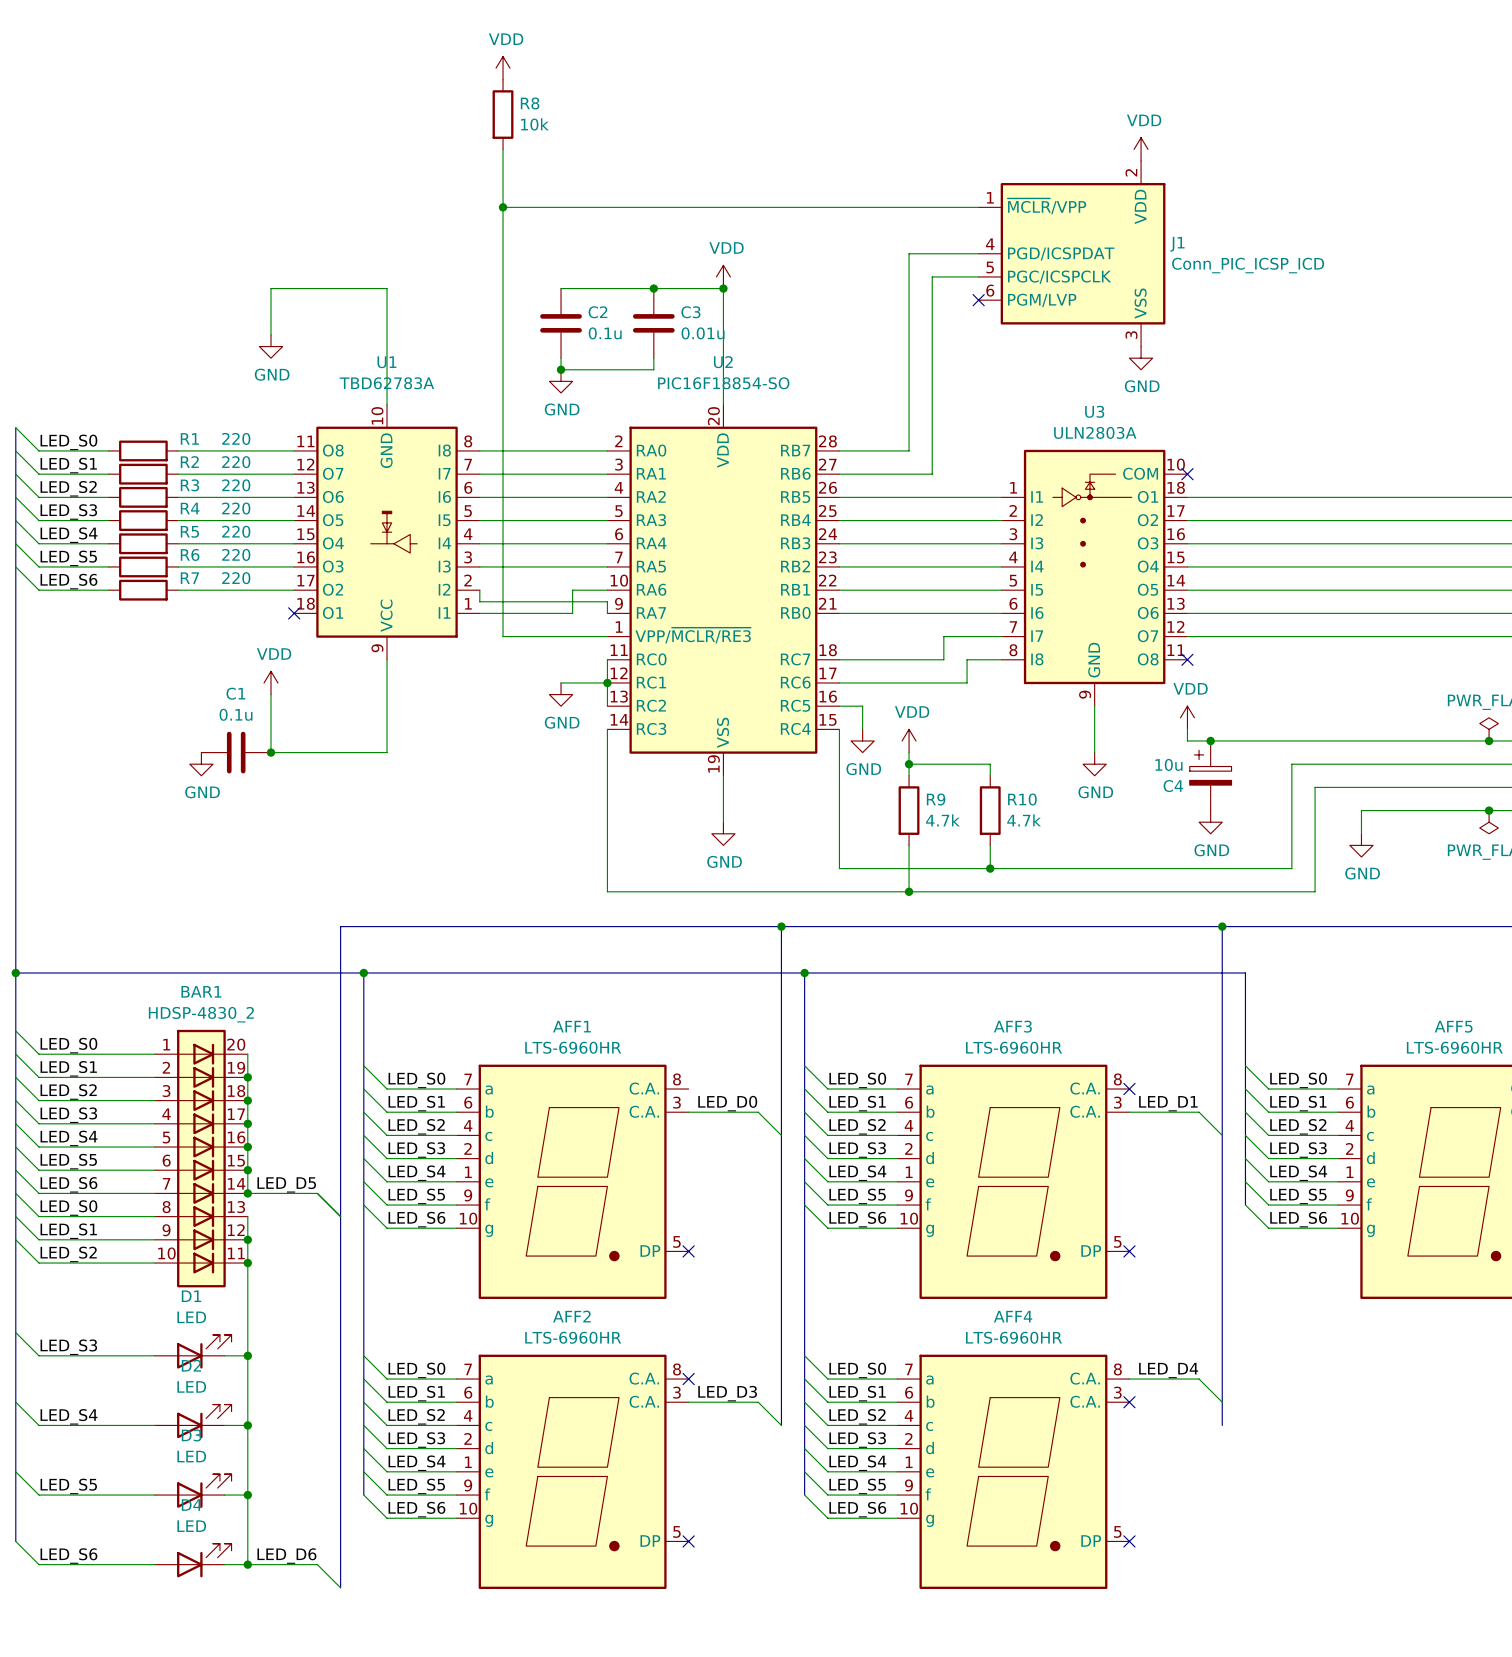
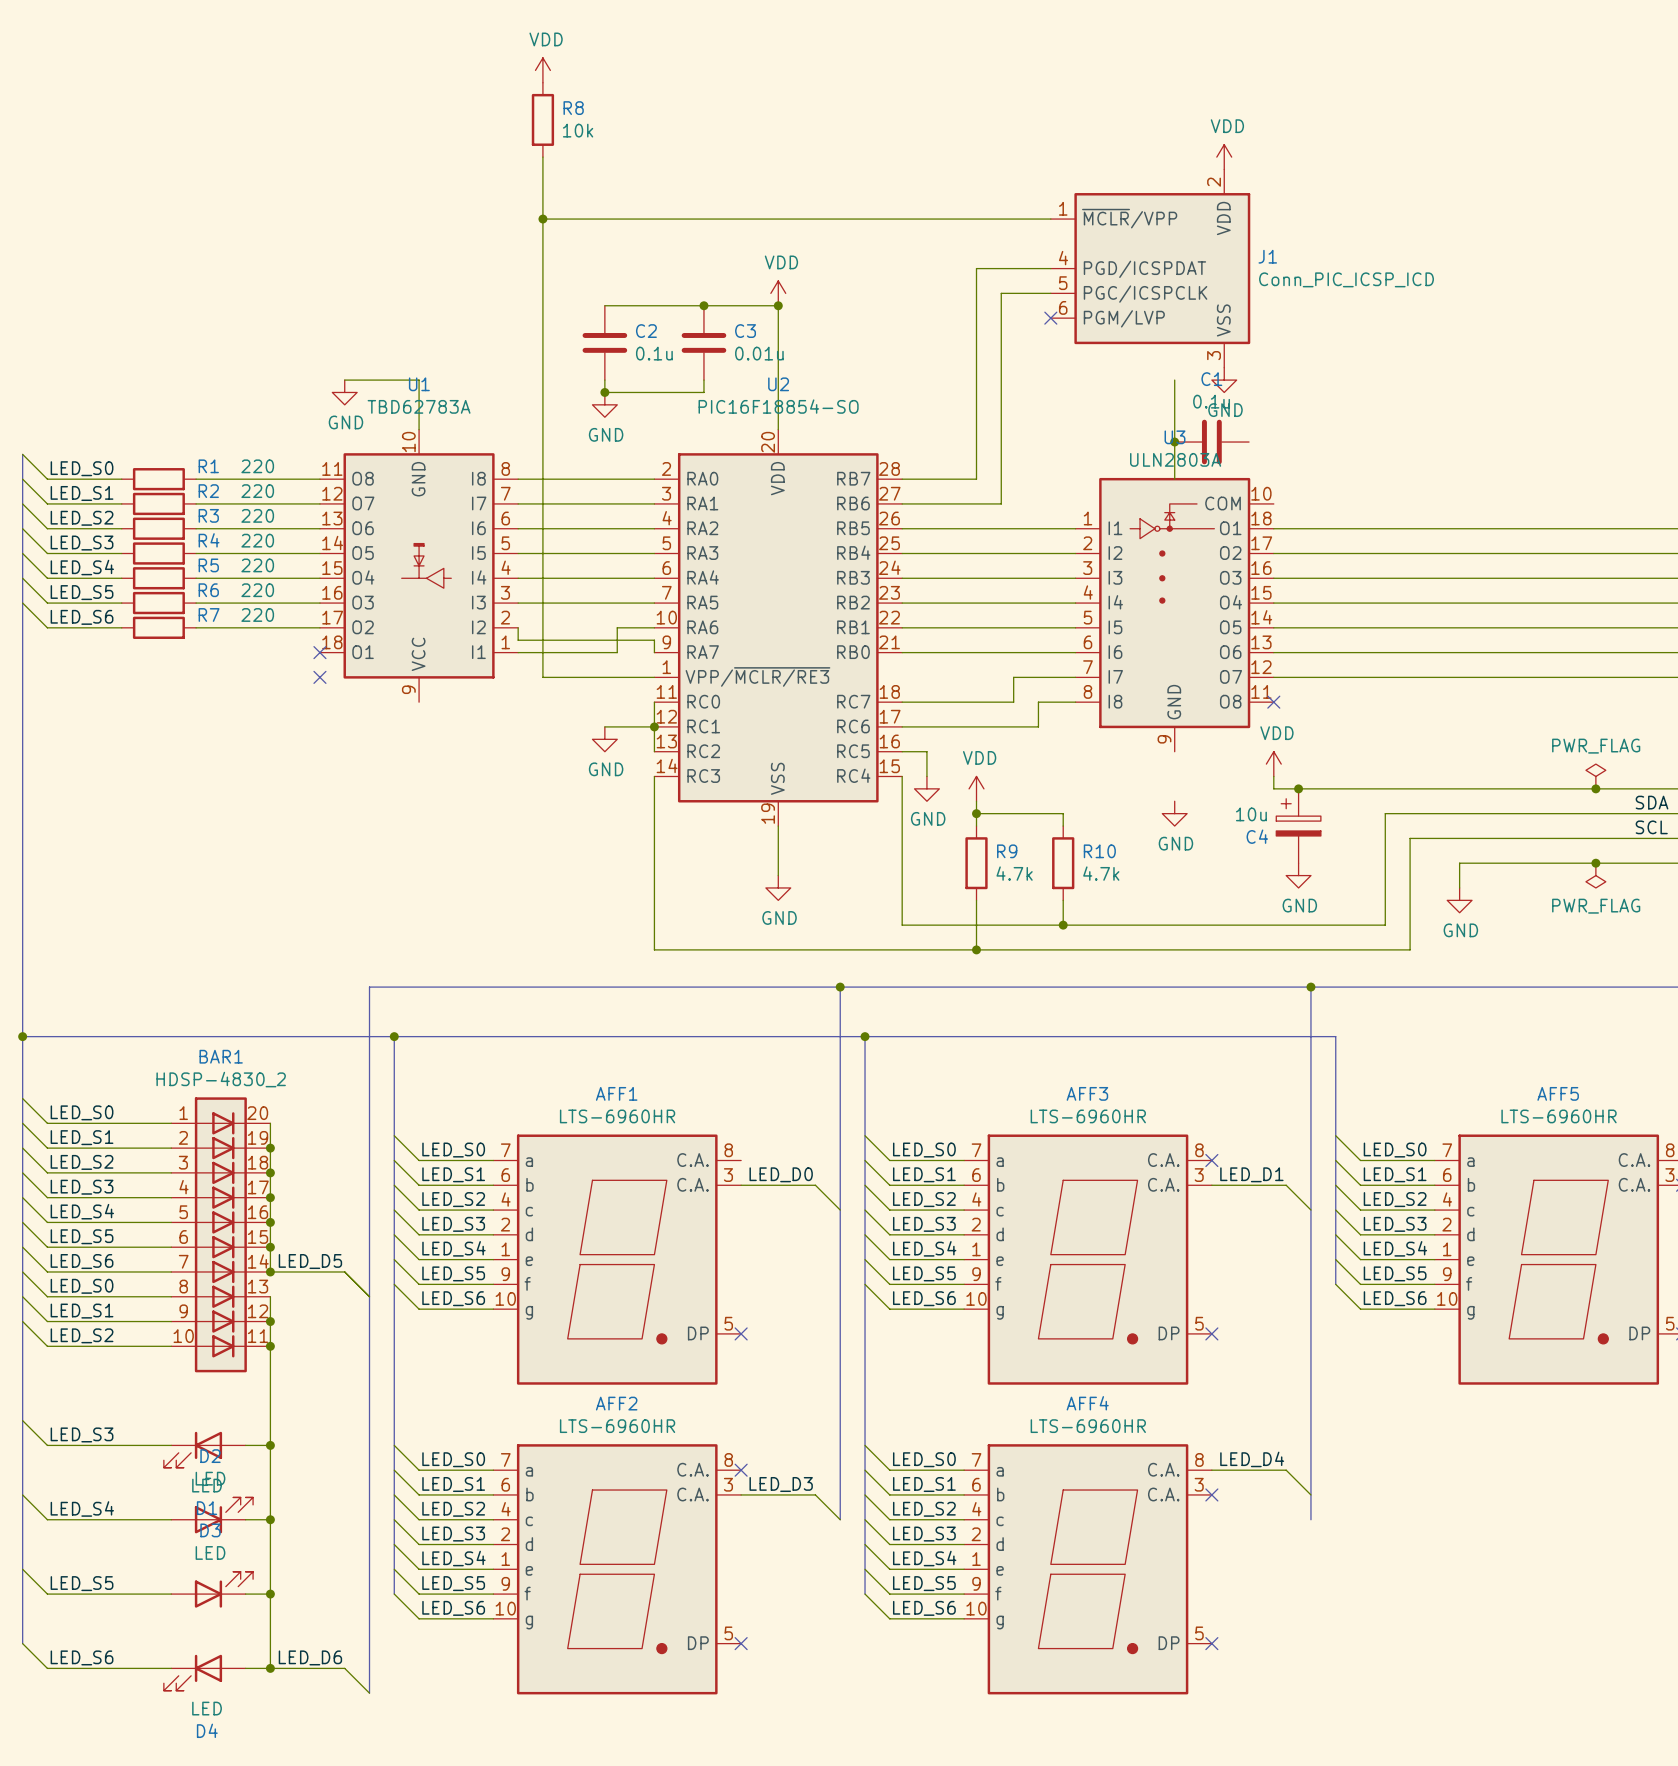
wire: (271, 334) (271, 288) (387, 288) (387, 358) -> (344, 380) (419, 380)
power symbol position: GND (271, 346) -> GND (344, 392)
wire: none -> (1174, 380) (1174, 479)
junction: none -> (1174, 442)
no-connect mark: (1187, 474) -> none
no-connect mark: none -> (319, 677)
wire: (387, 659) (387, 752) (271, 752) (271, 694) -> none
power symbol: VDD (271, 682) -> none
wire: (1094, 706) (1094, 752) -> none
C1 position: (236, 752) -> (1211, 442)
junction: (271, 752) -> none
power symbol: GND (201, 764) -> none
D1 rotation: 0° (204, 1351) -> 180° (192, 1449)
D4 rotation: 0° (204, 1560) -> 180° (192, 1672)

